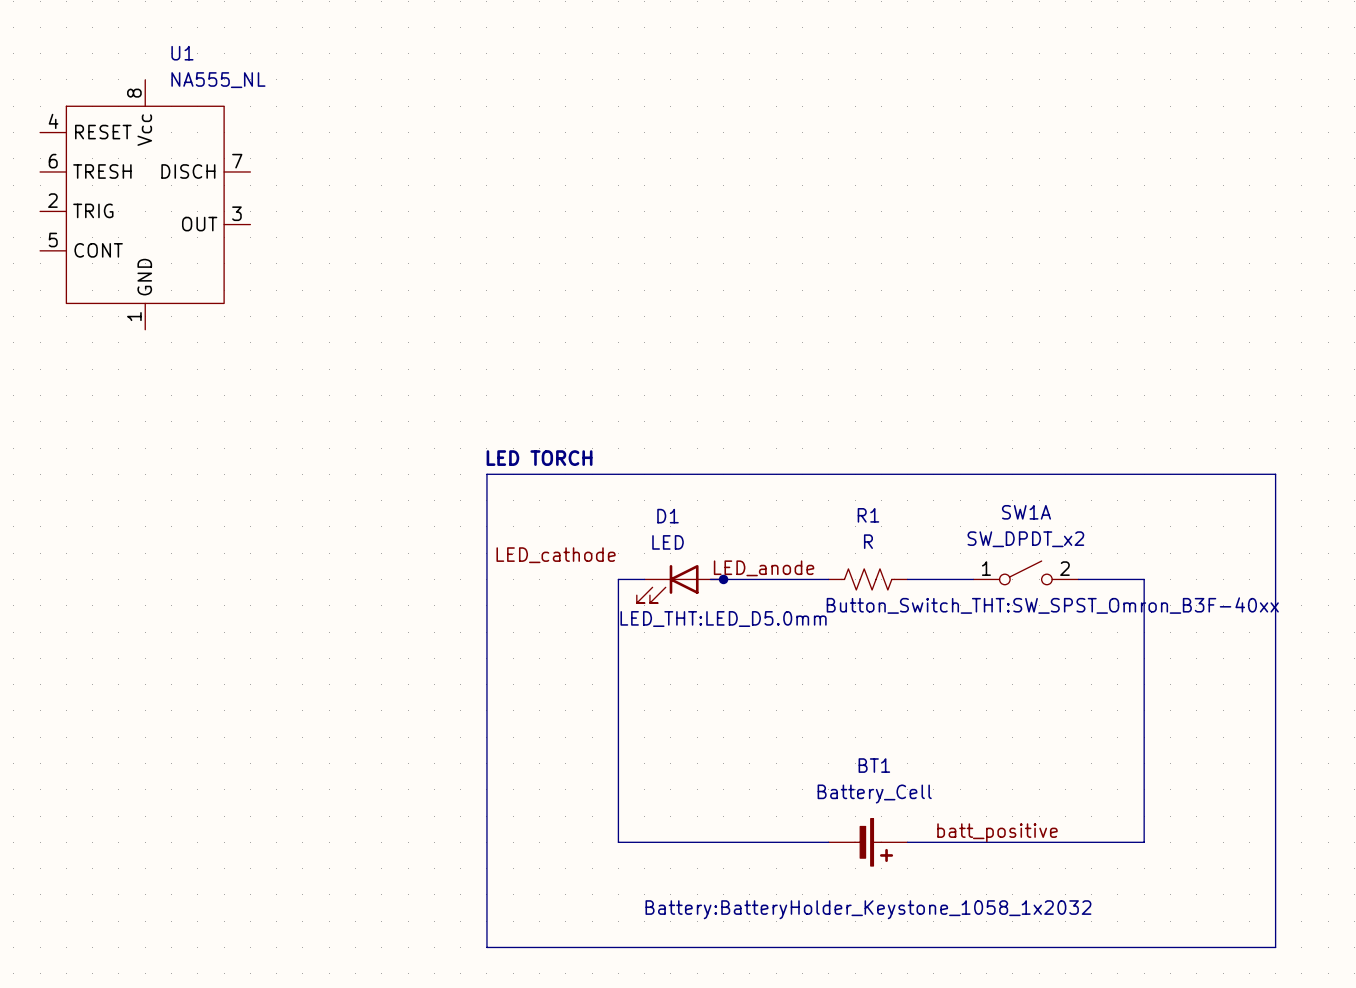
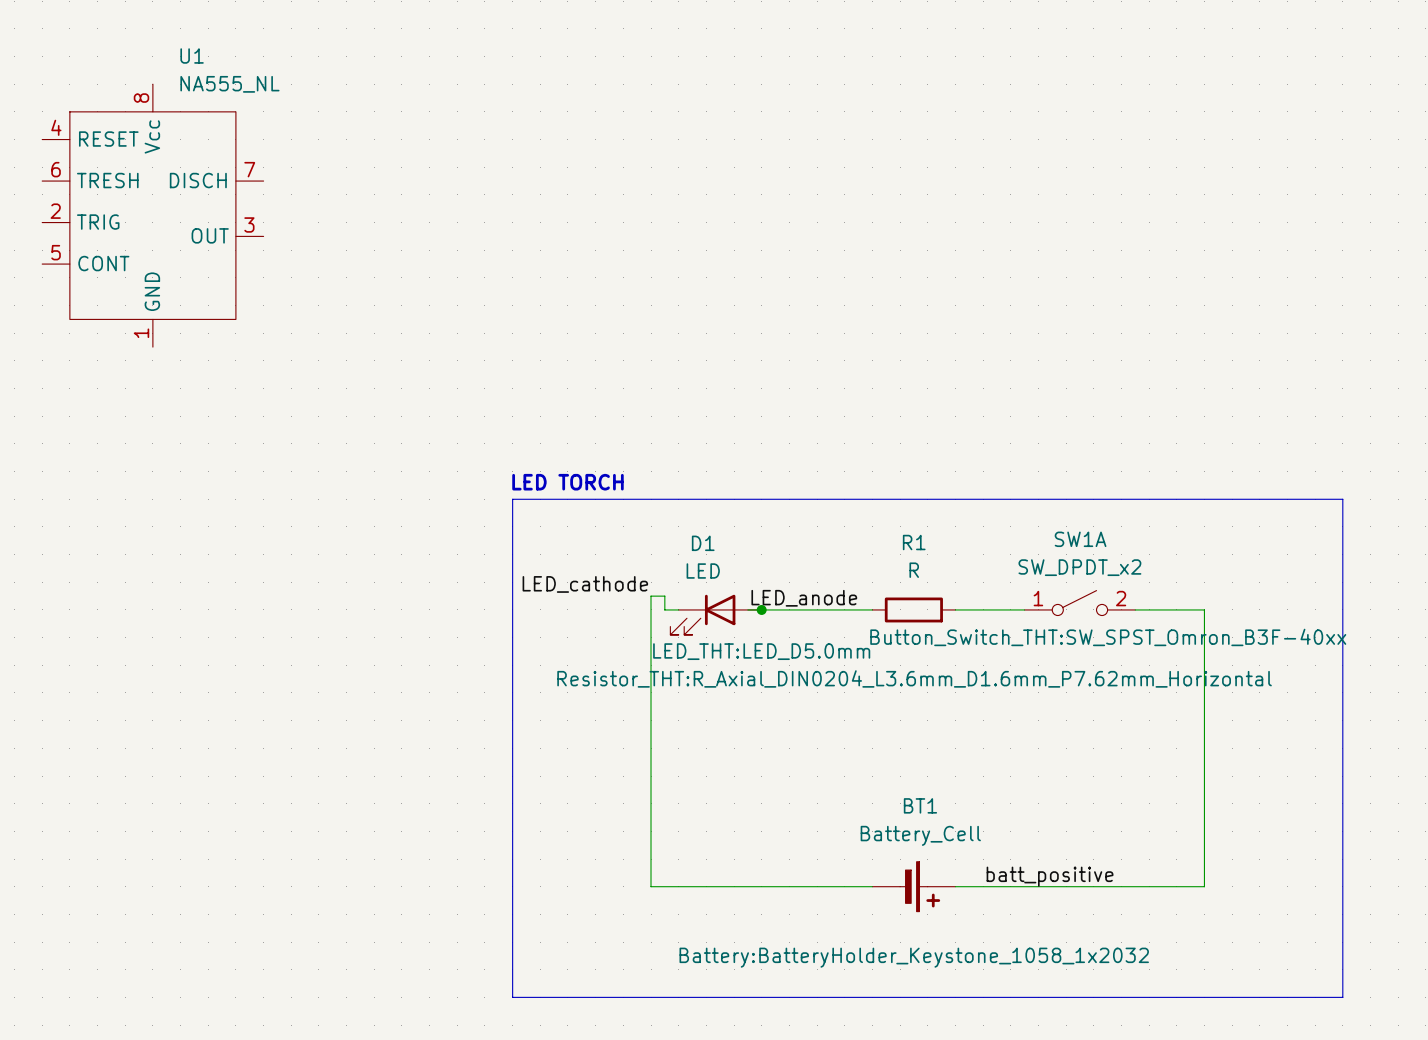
R1 symbol: [828, 568, 908, 590] -> [872, 597, 956, 623]
wire: (618, 579) (631, 579) -> (651, 609) (651, 596) (664, 596) (664, 609)
R1 text: none -> Resistor_THT:R_Axial_DIN0204_L3.6mm_D1.6mm_P7.62mm_Horizontal (914, 678)

